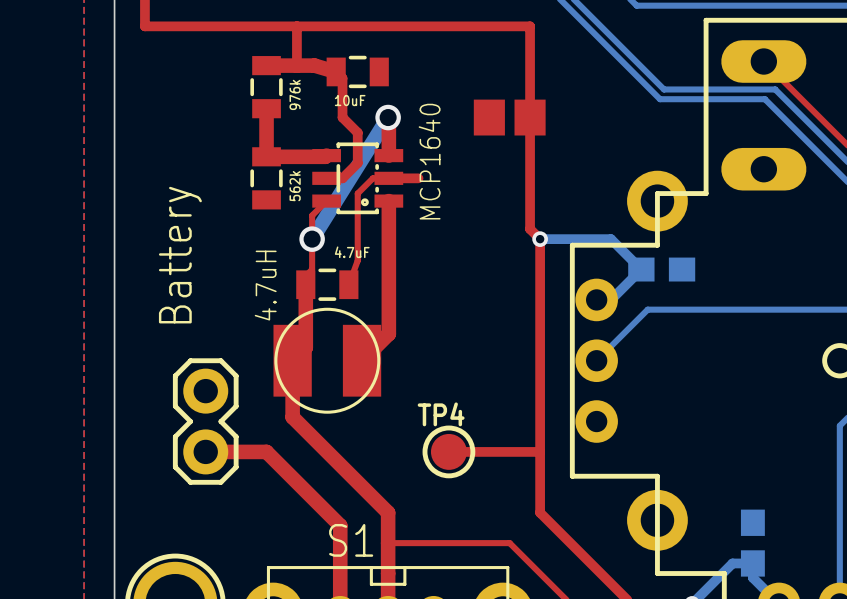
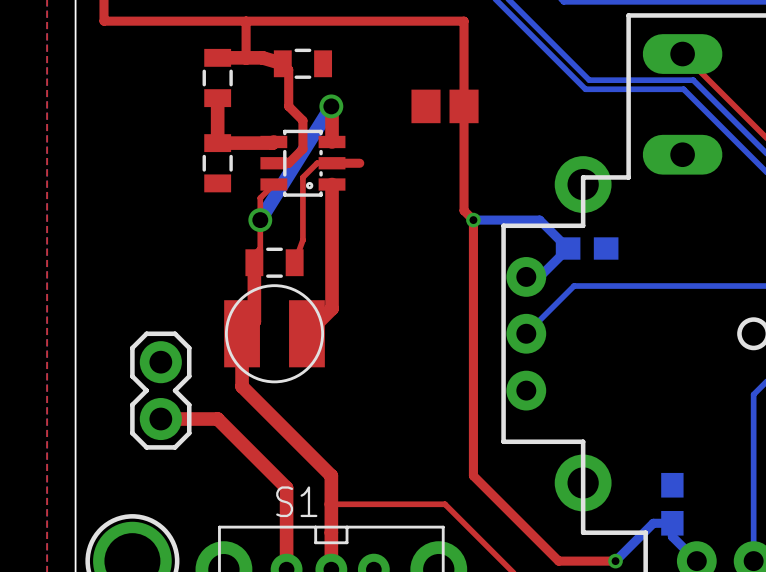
part value: 976k (295, 94) -> none
part value: 10uF (350, 100) -> none
part value: MCP1640 (429, 161) -> none
part value: 562k (295, 186) -> none
part value: 4.7uF (352, 252) -> none
part value: Battery (180, 255) -> none
part value: 4.7uH (265, 285) -> none
top track: (448, 451) (540, 451) -> none
TP4: (448, 451) -> none

